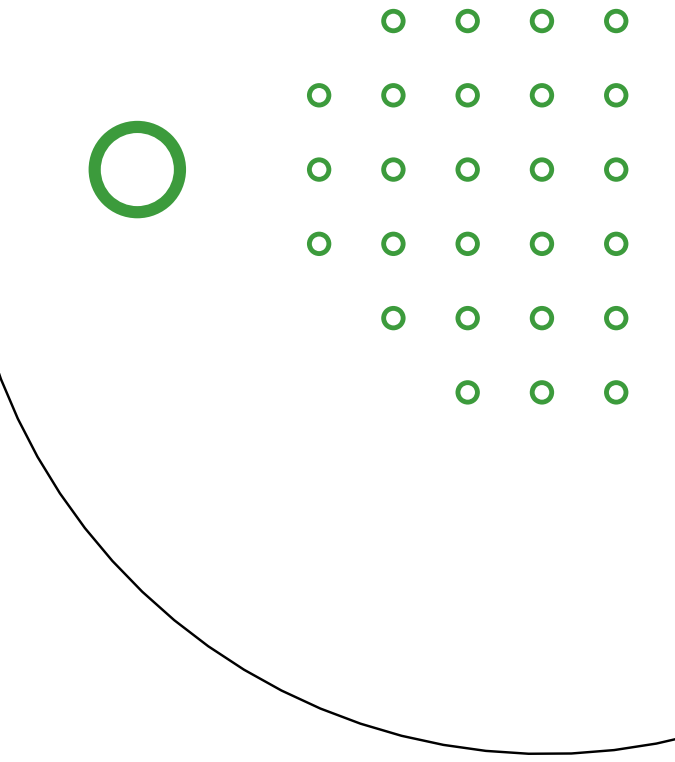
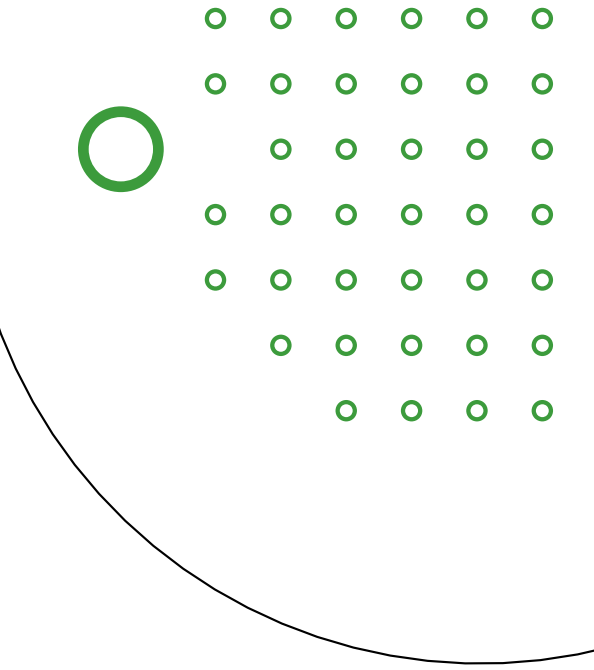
via: none -> (215, 18)
via: none -> (280, 18)
via: none -> (215, 83)
via: none -> (215, 214)
via: none -> (215, 279)
via: none -> (280, 279)
via: none -> (280, 345)
via: none -> (346, 345)
via: none -> (346, 410)
via: none -> (411, 410)
via: none -> (476, 410)
via: none -> (542, 410)

